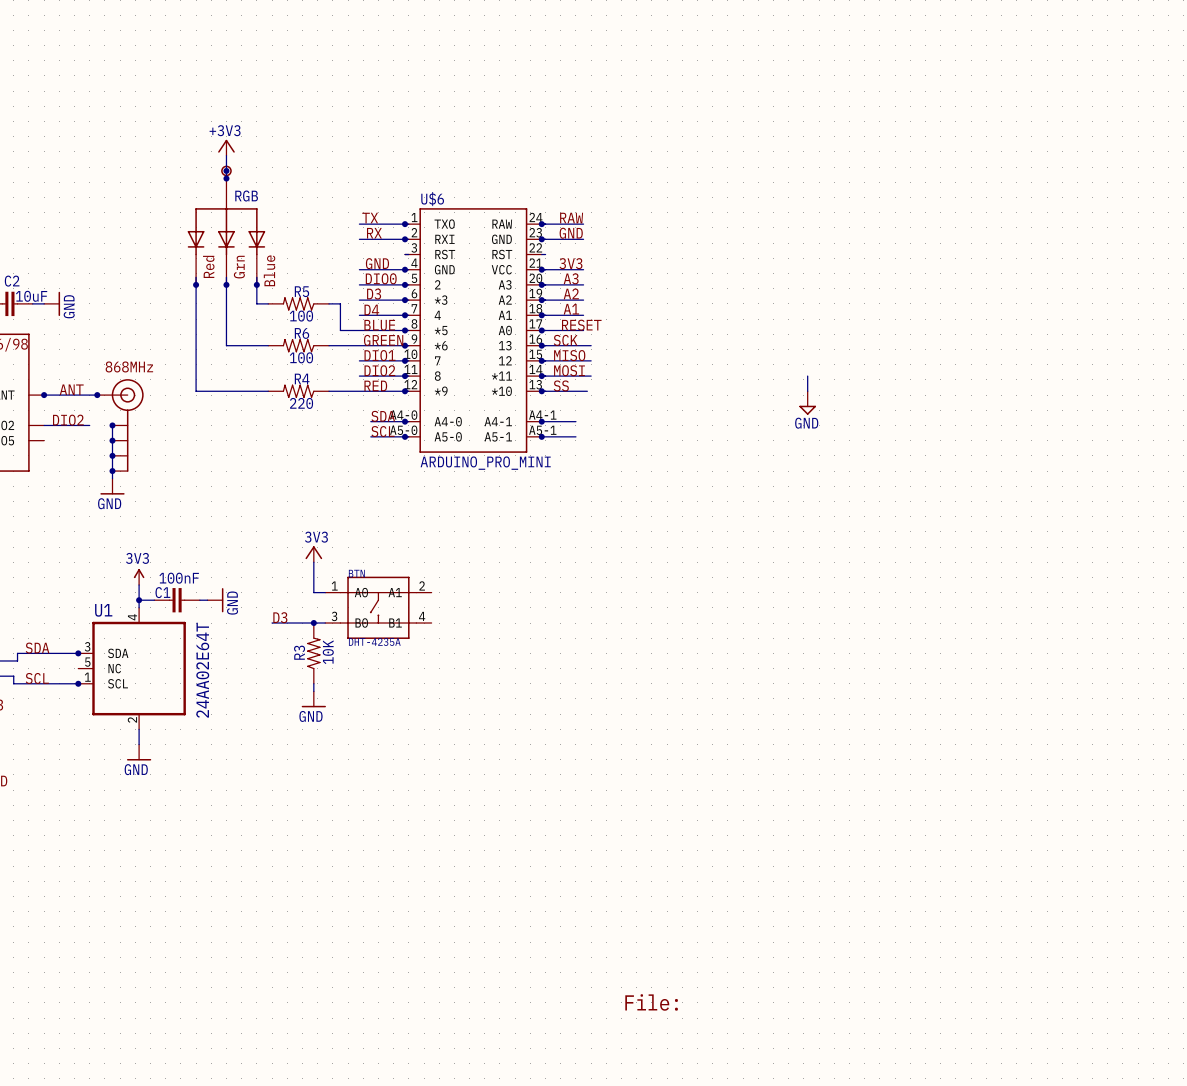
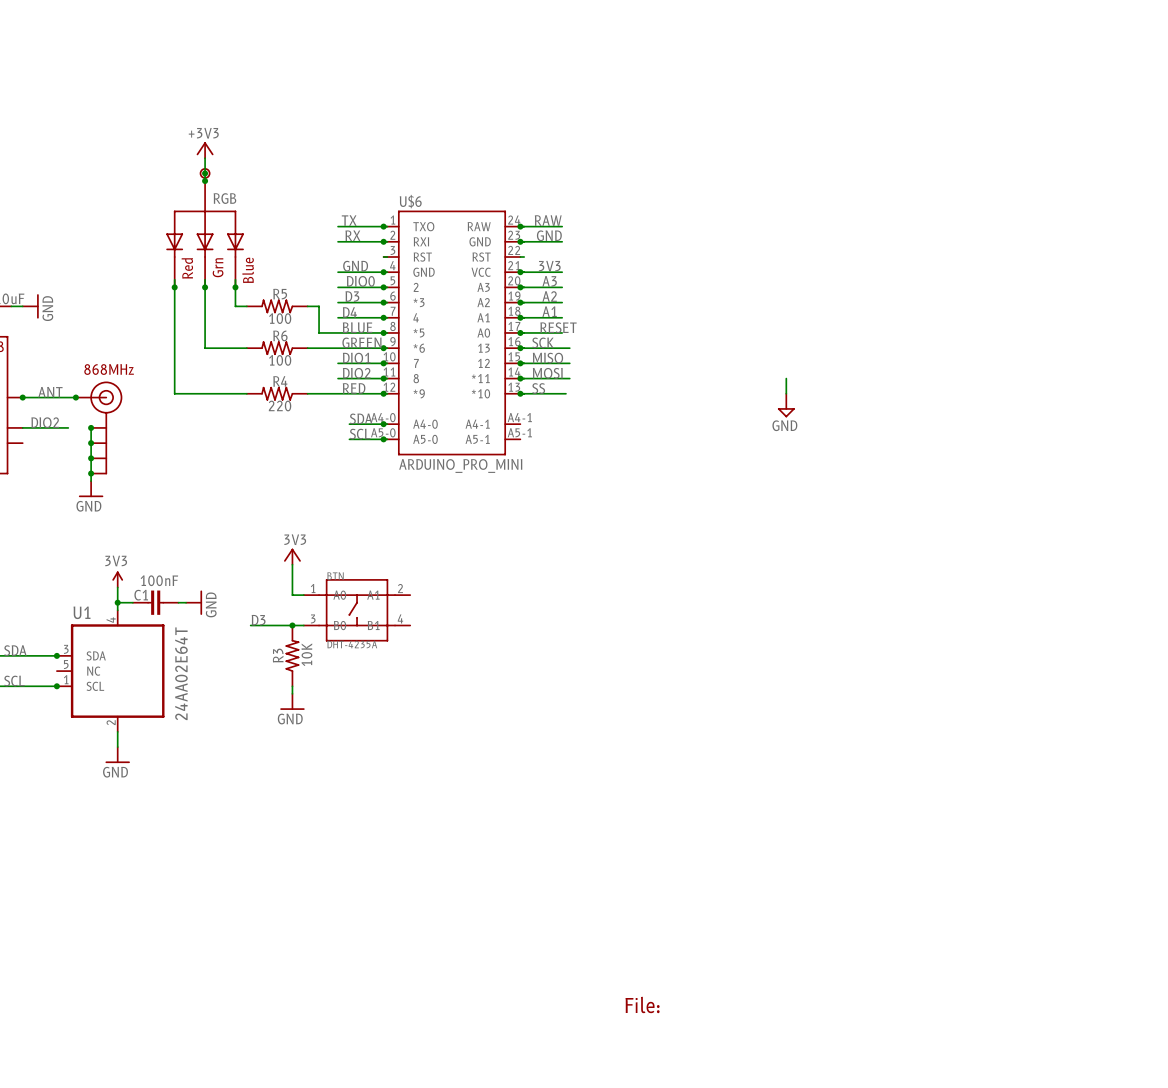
wire: (541, 421) (575, 421) -> none
junction: (541, 421) -> none
wire: (541, 436) (575, 436) -> none
junction: (541, 436) -> none

